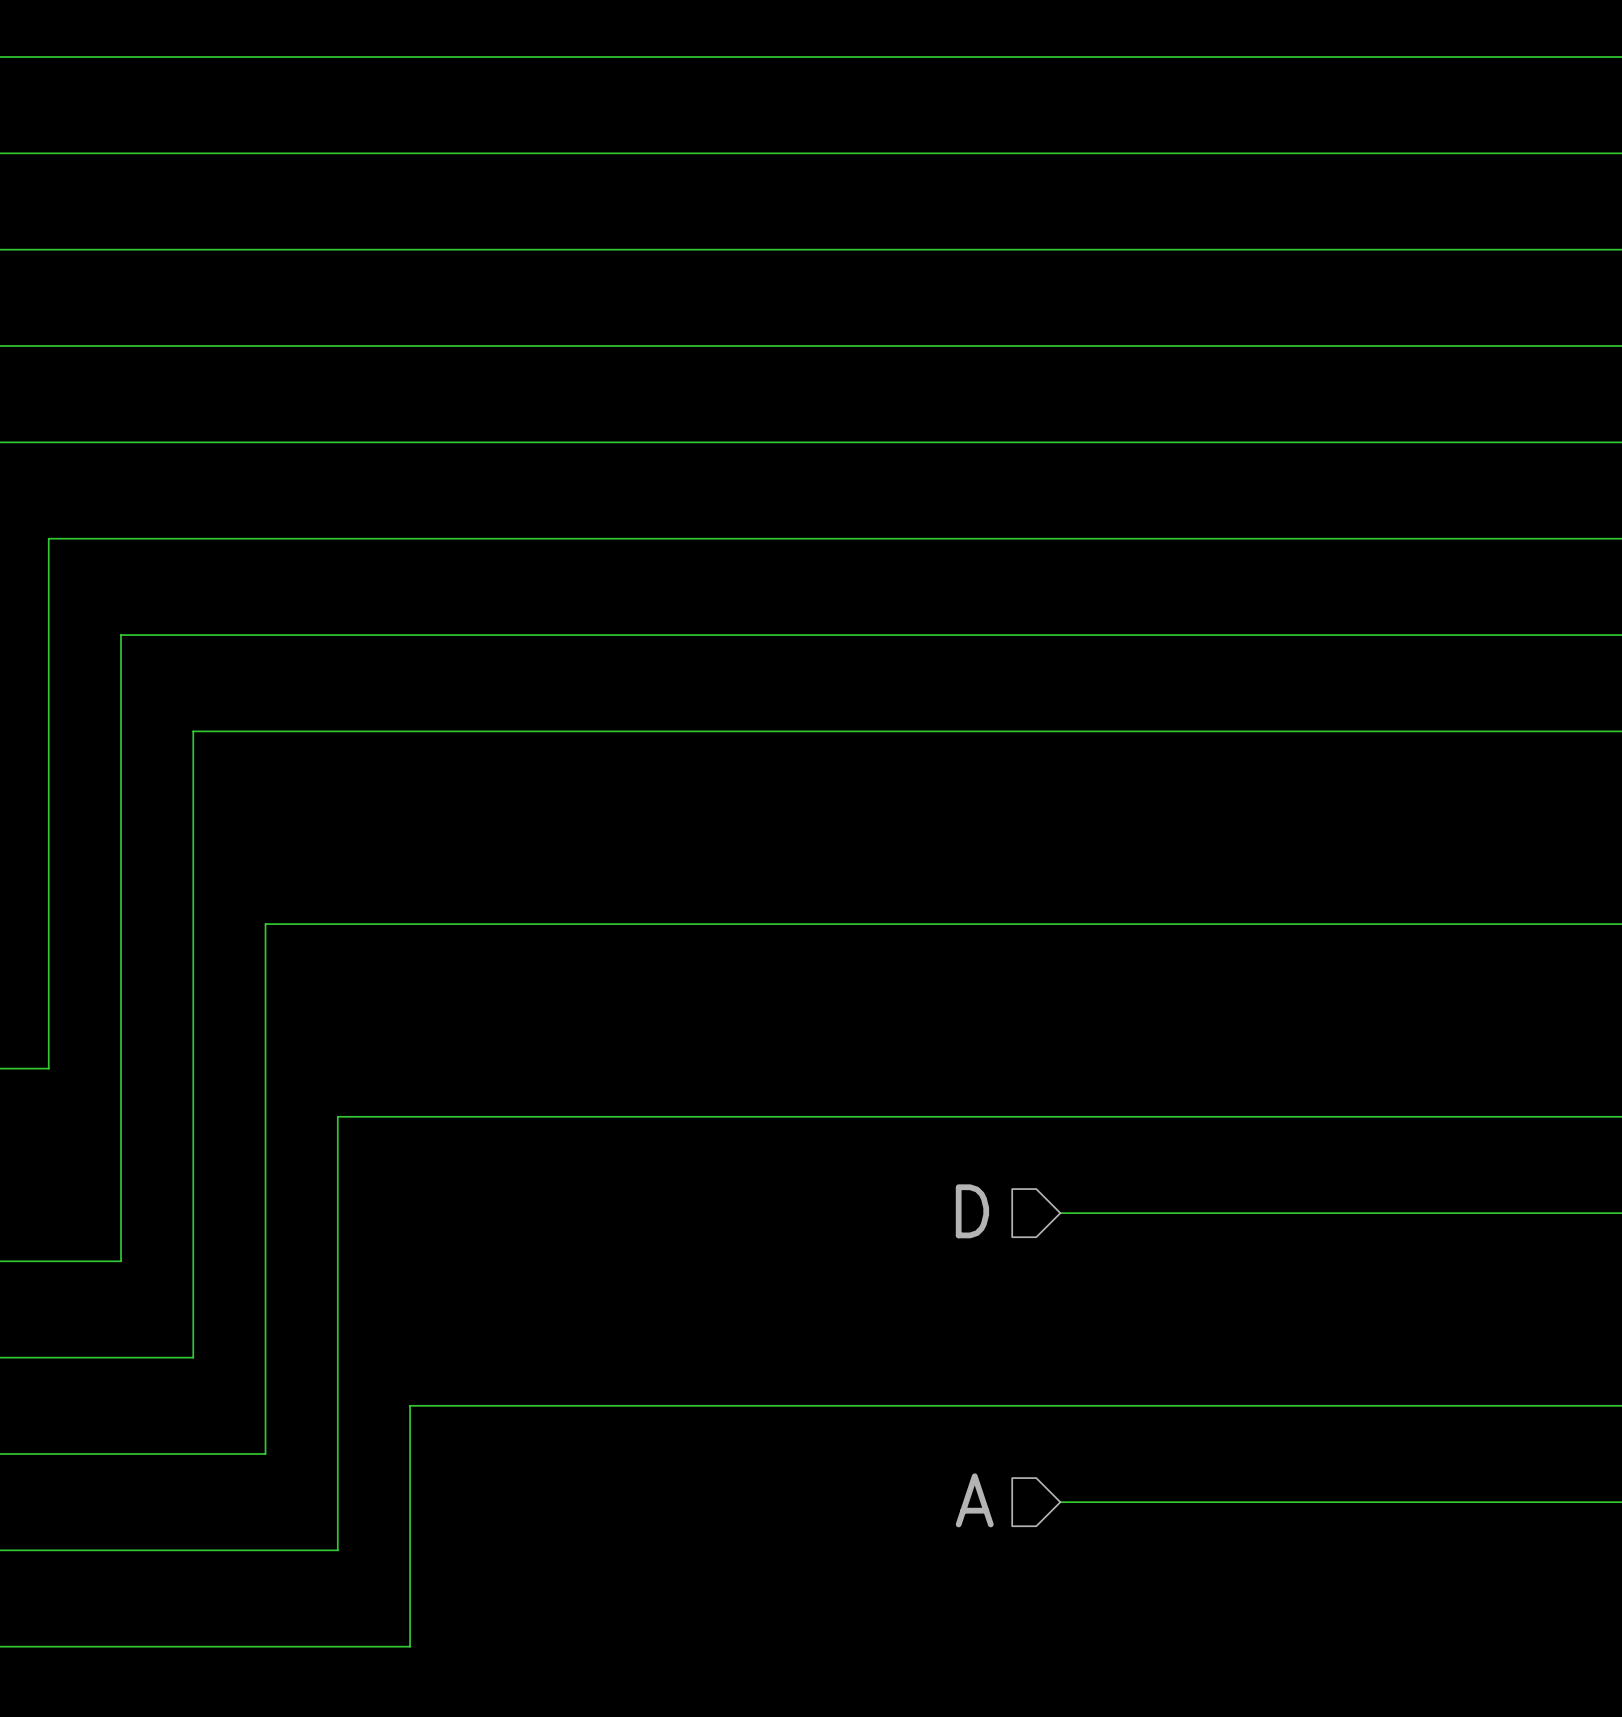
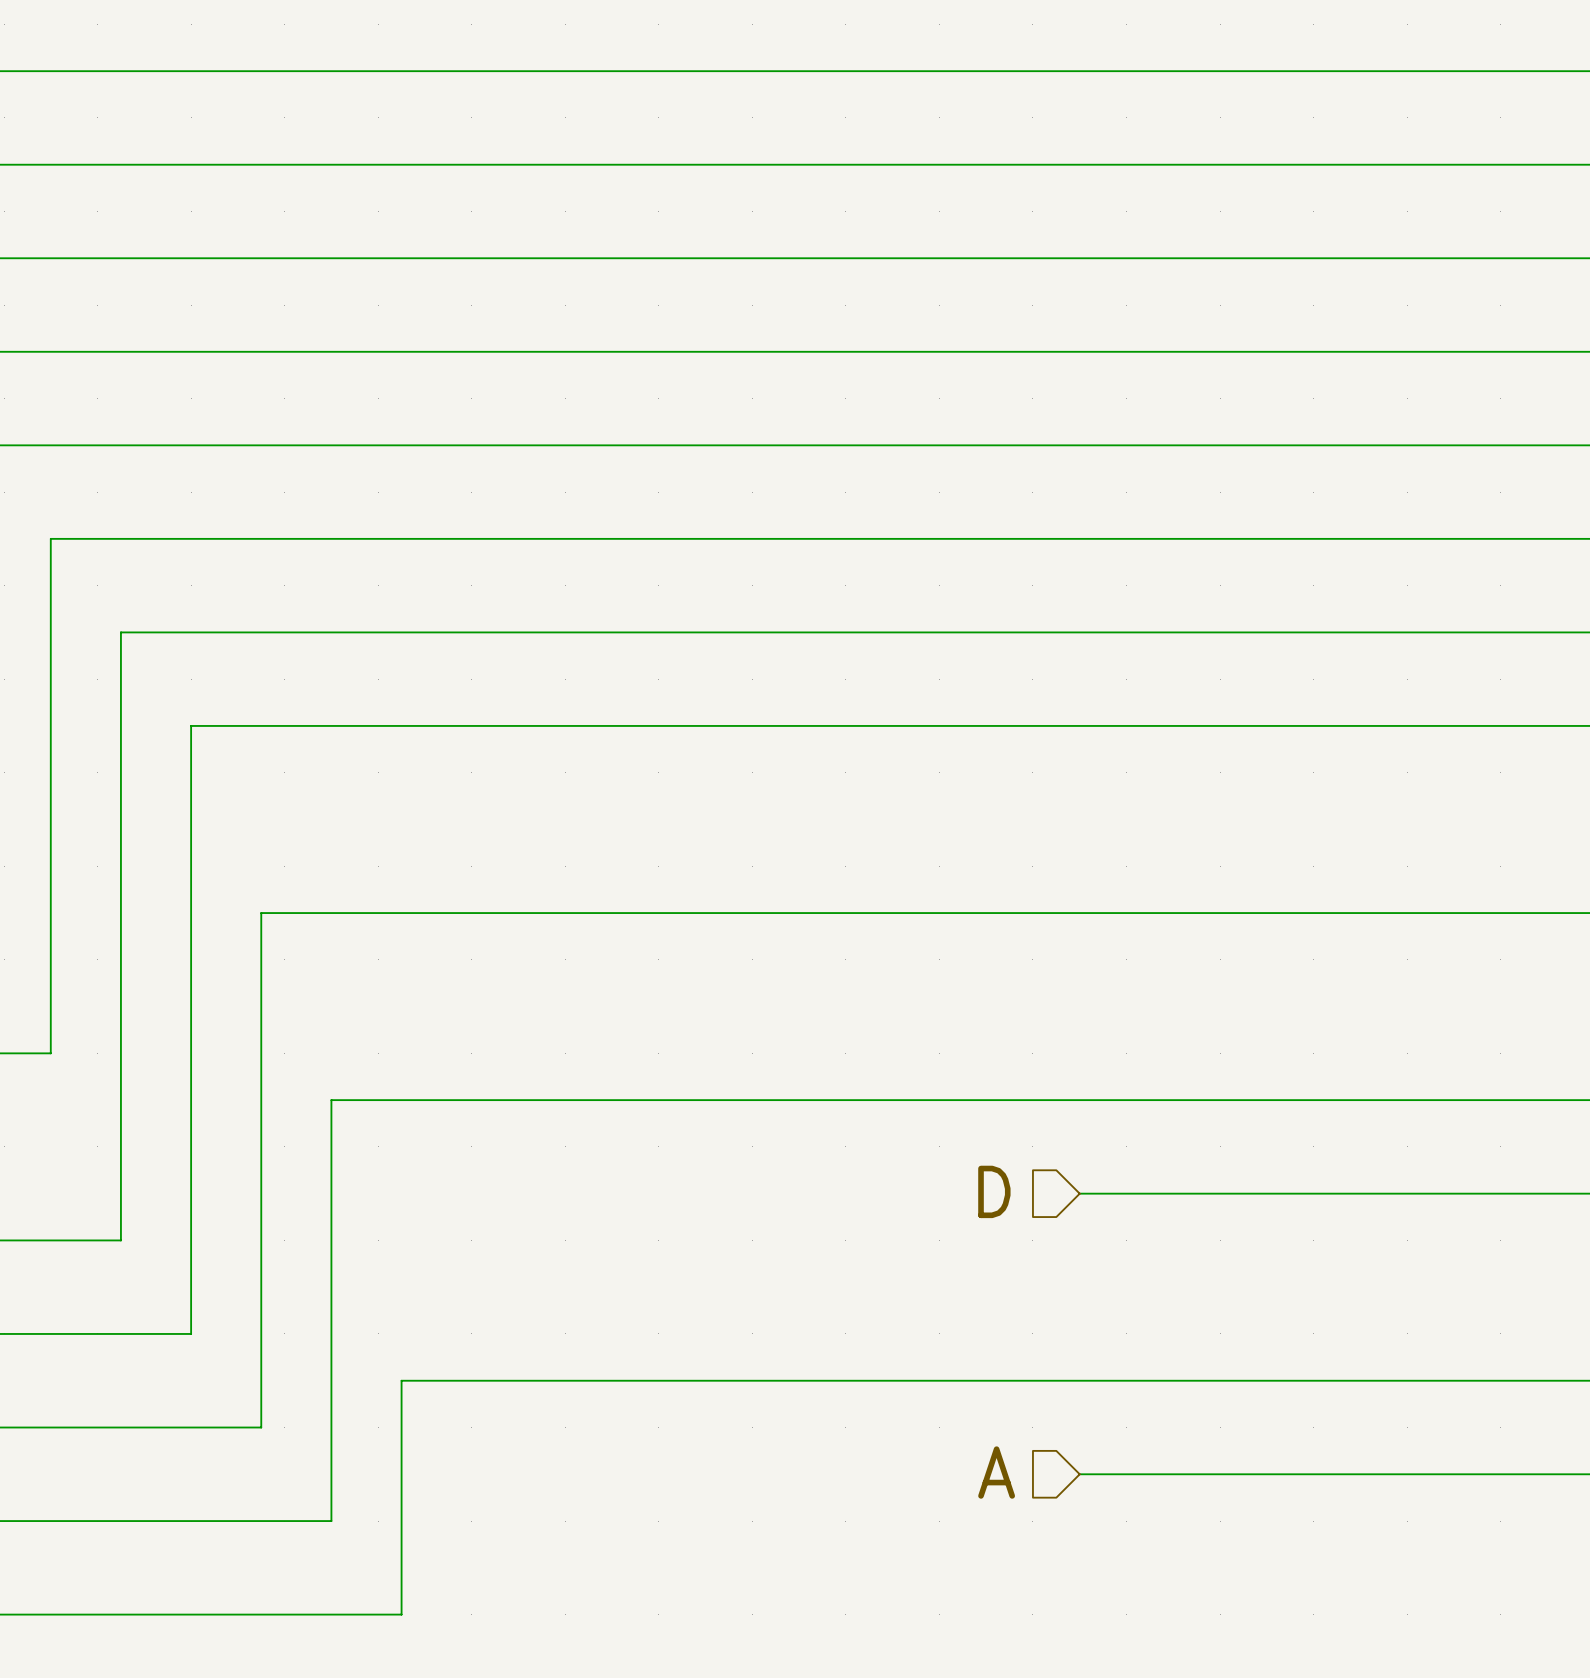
hierarchical label position: D (972, 1211) -> D (994, 1191)
wire: (1060, 1213) (1108, 1213) -> none
hierarchical label position: A (974, 1500) -> A (996, 1472)
wire: (1060, 1502) (1108, 1502) -> none

